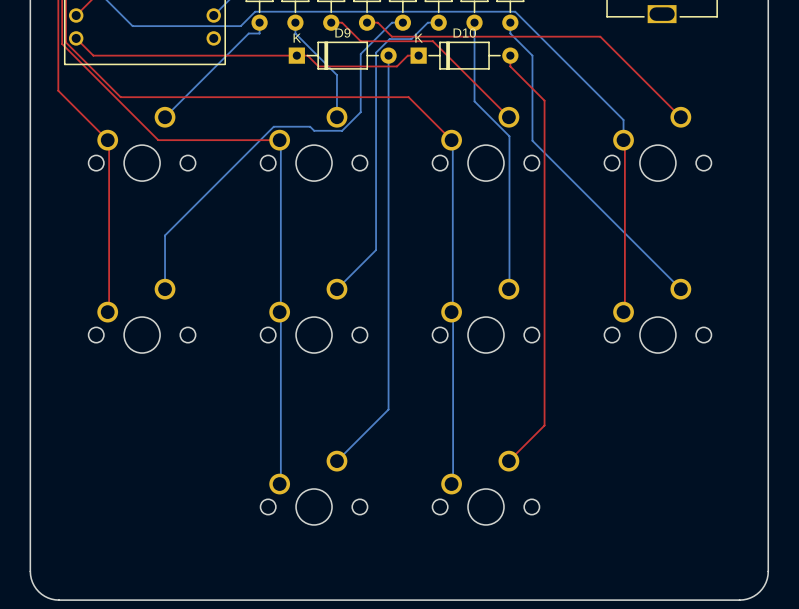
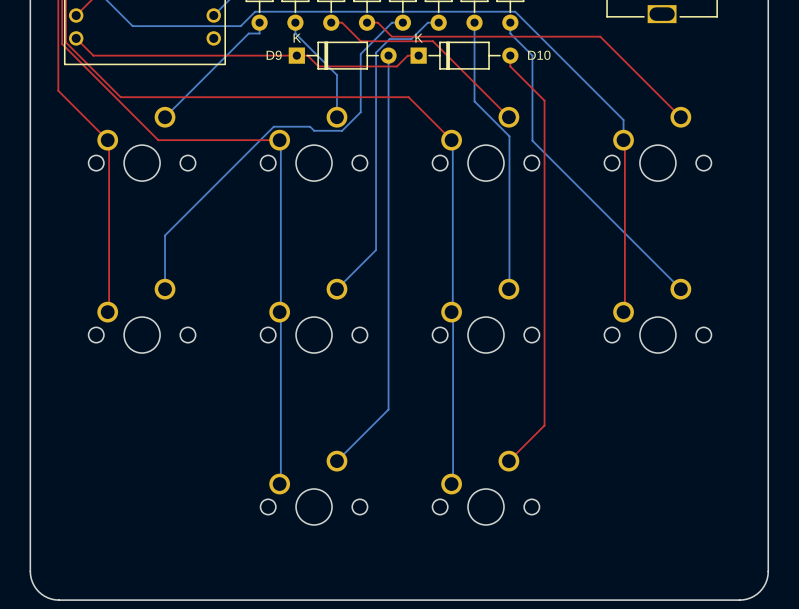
D9 name position: D9 (342, 32) -> D9 (274, 55)
D10 name position: D10 (464, 32) -> D10 (539, 55)

